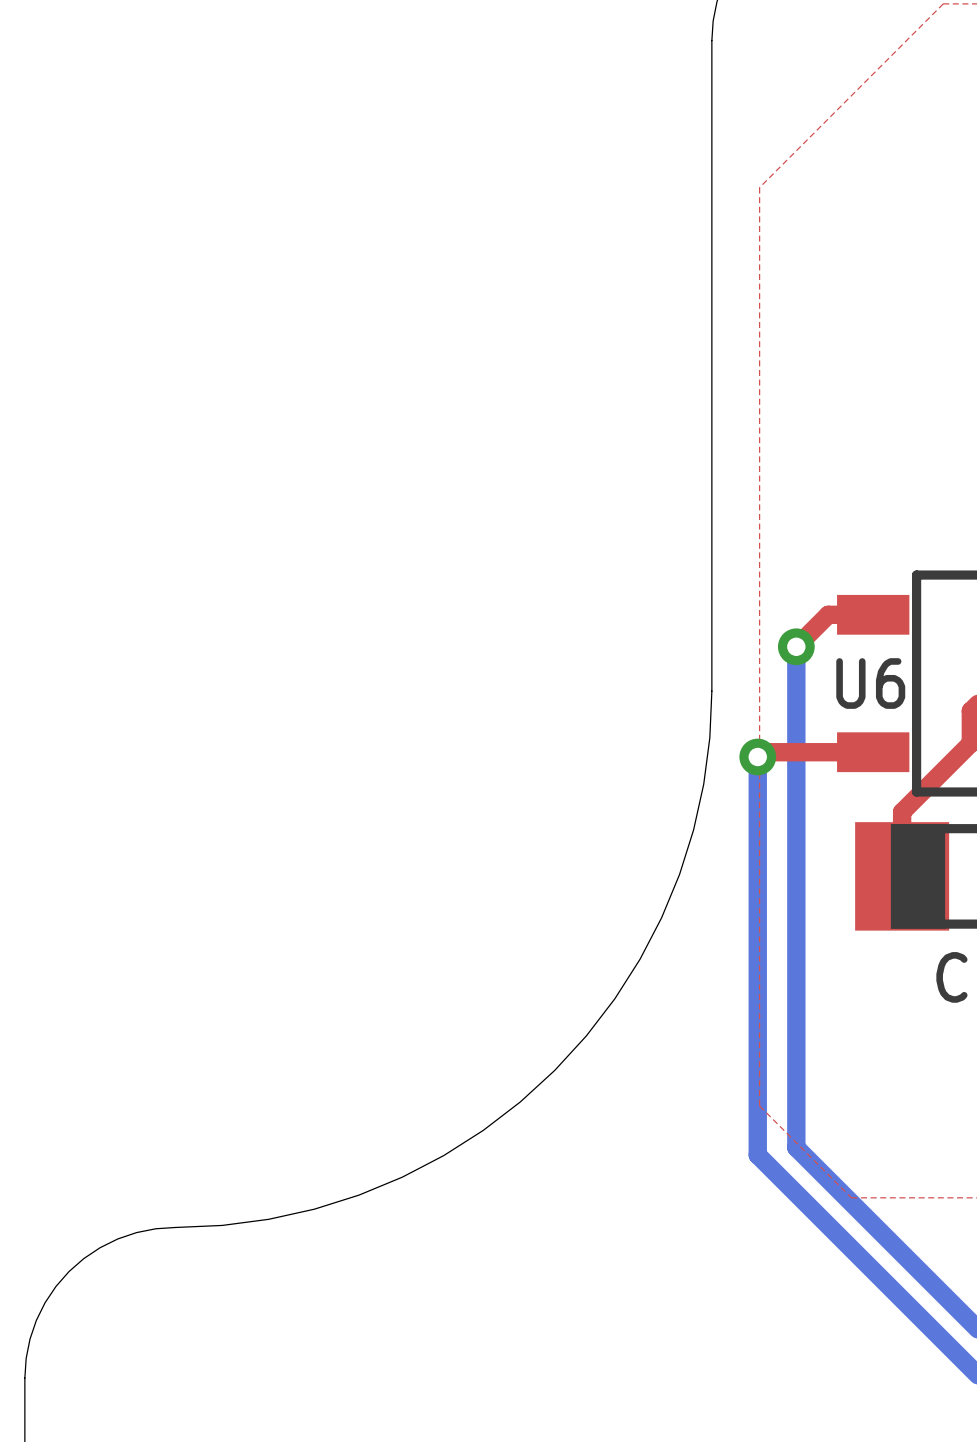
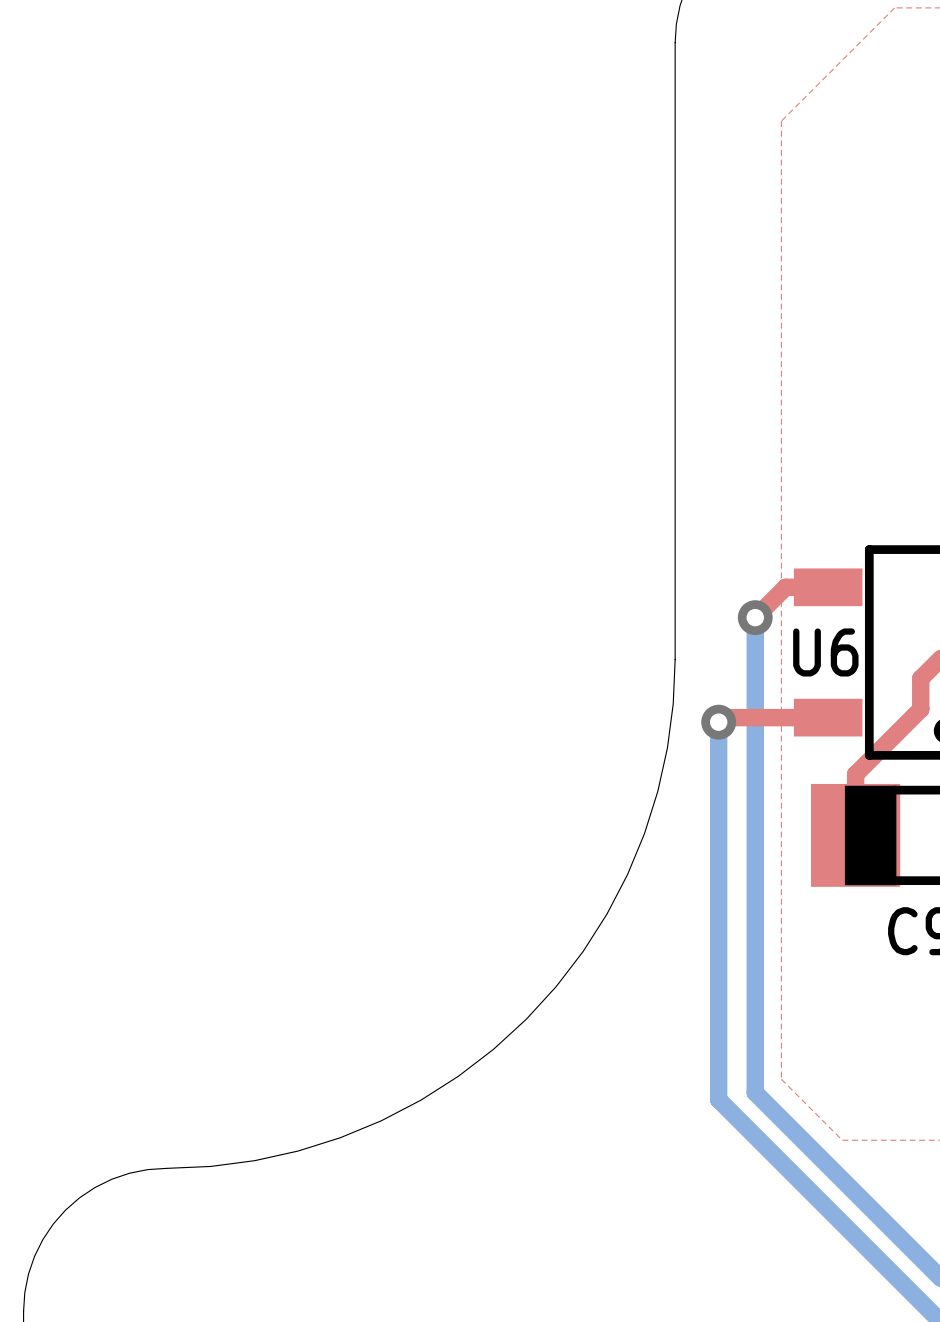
top zone outline: (823, 123) (759, 187) (759, 1105) (851, 1197) (888, 1197) -> (781, 121) (781, 1079) (842, 1140)

